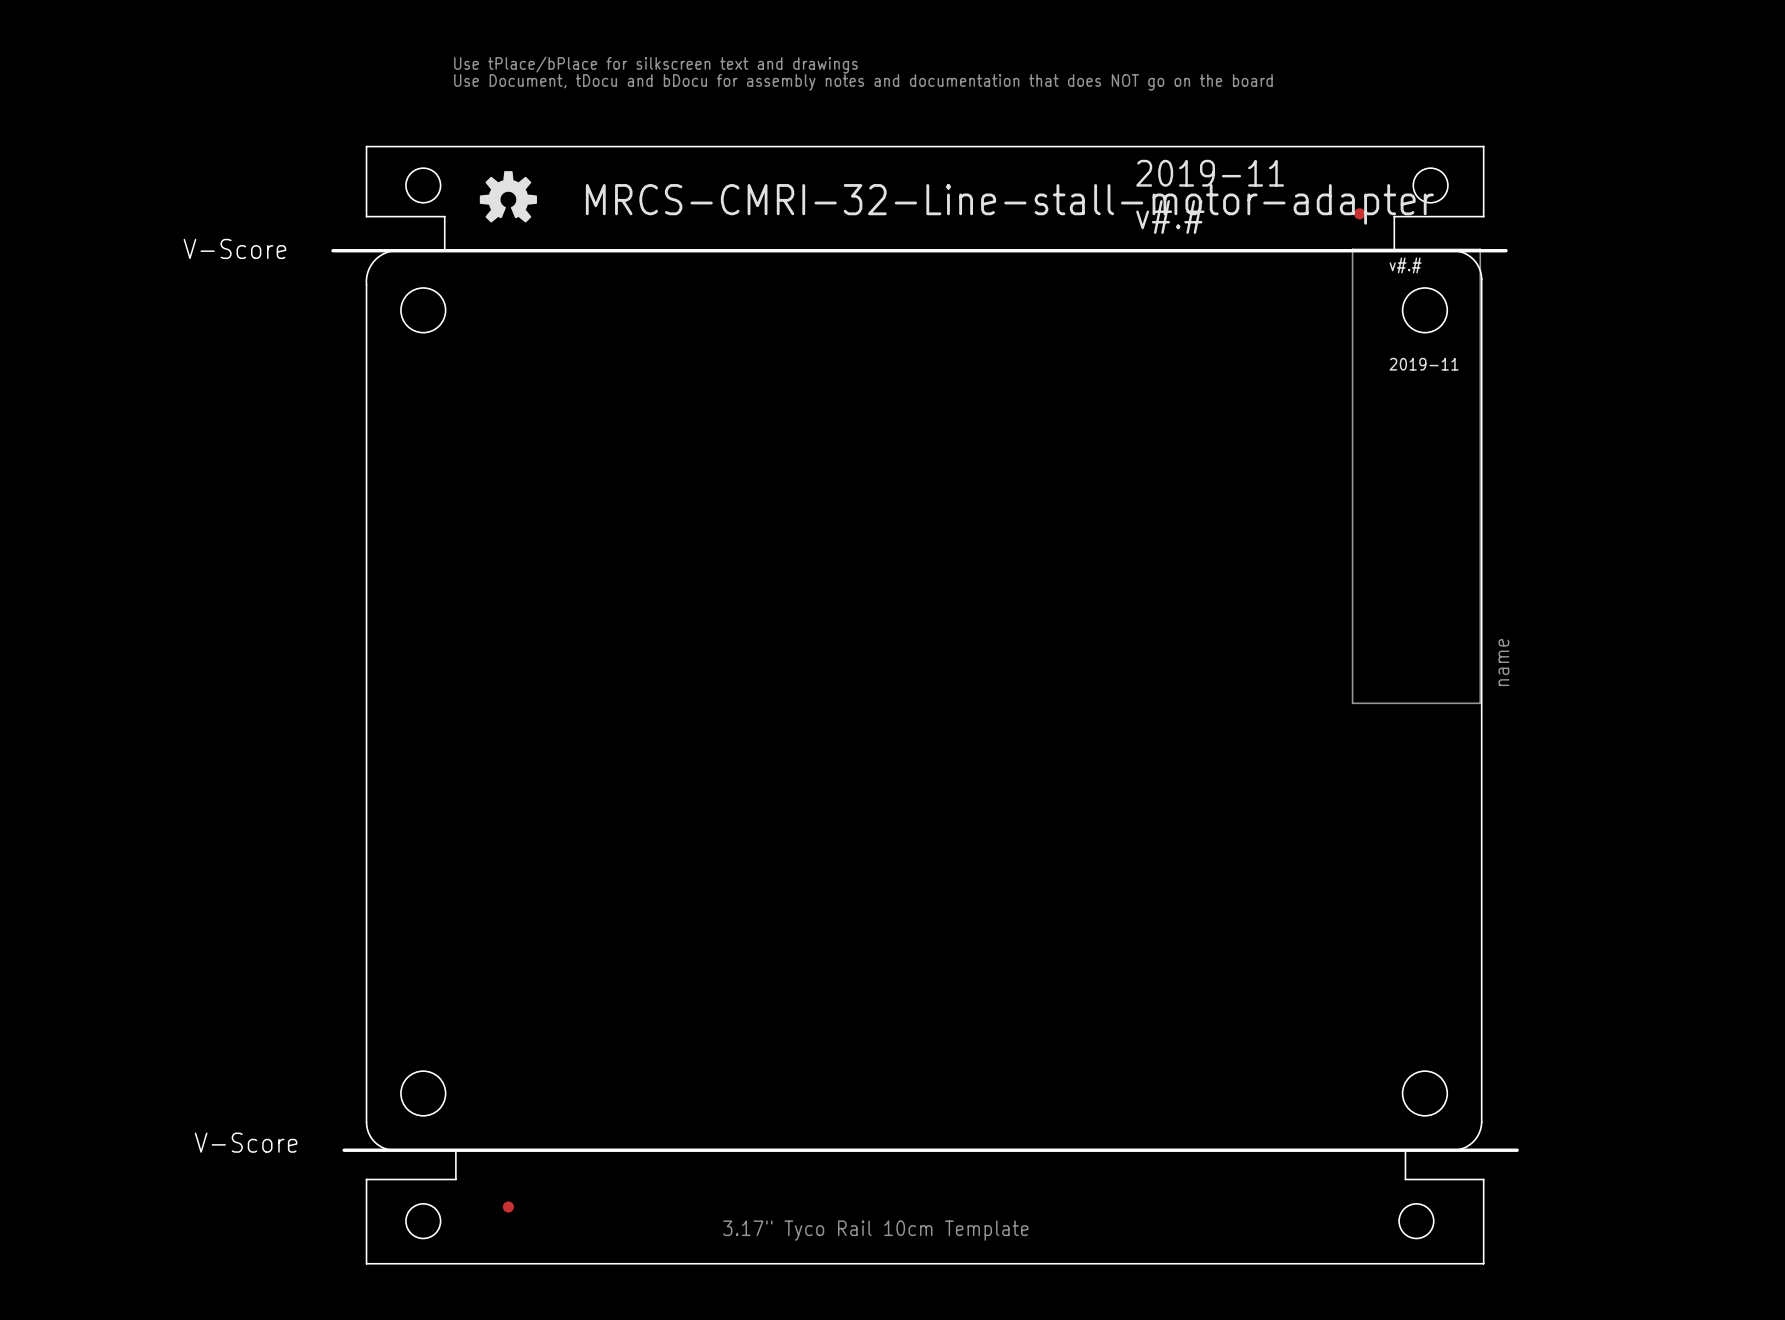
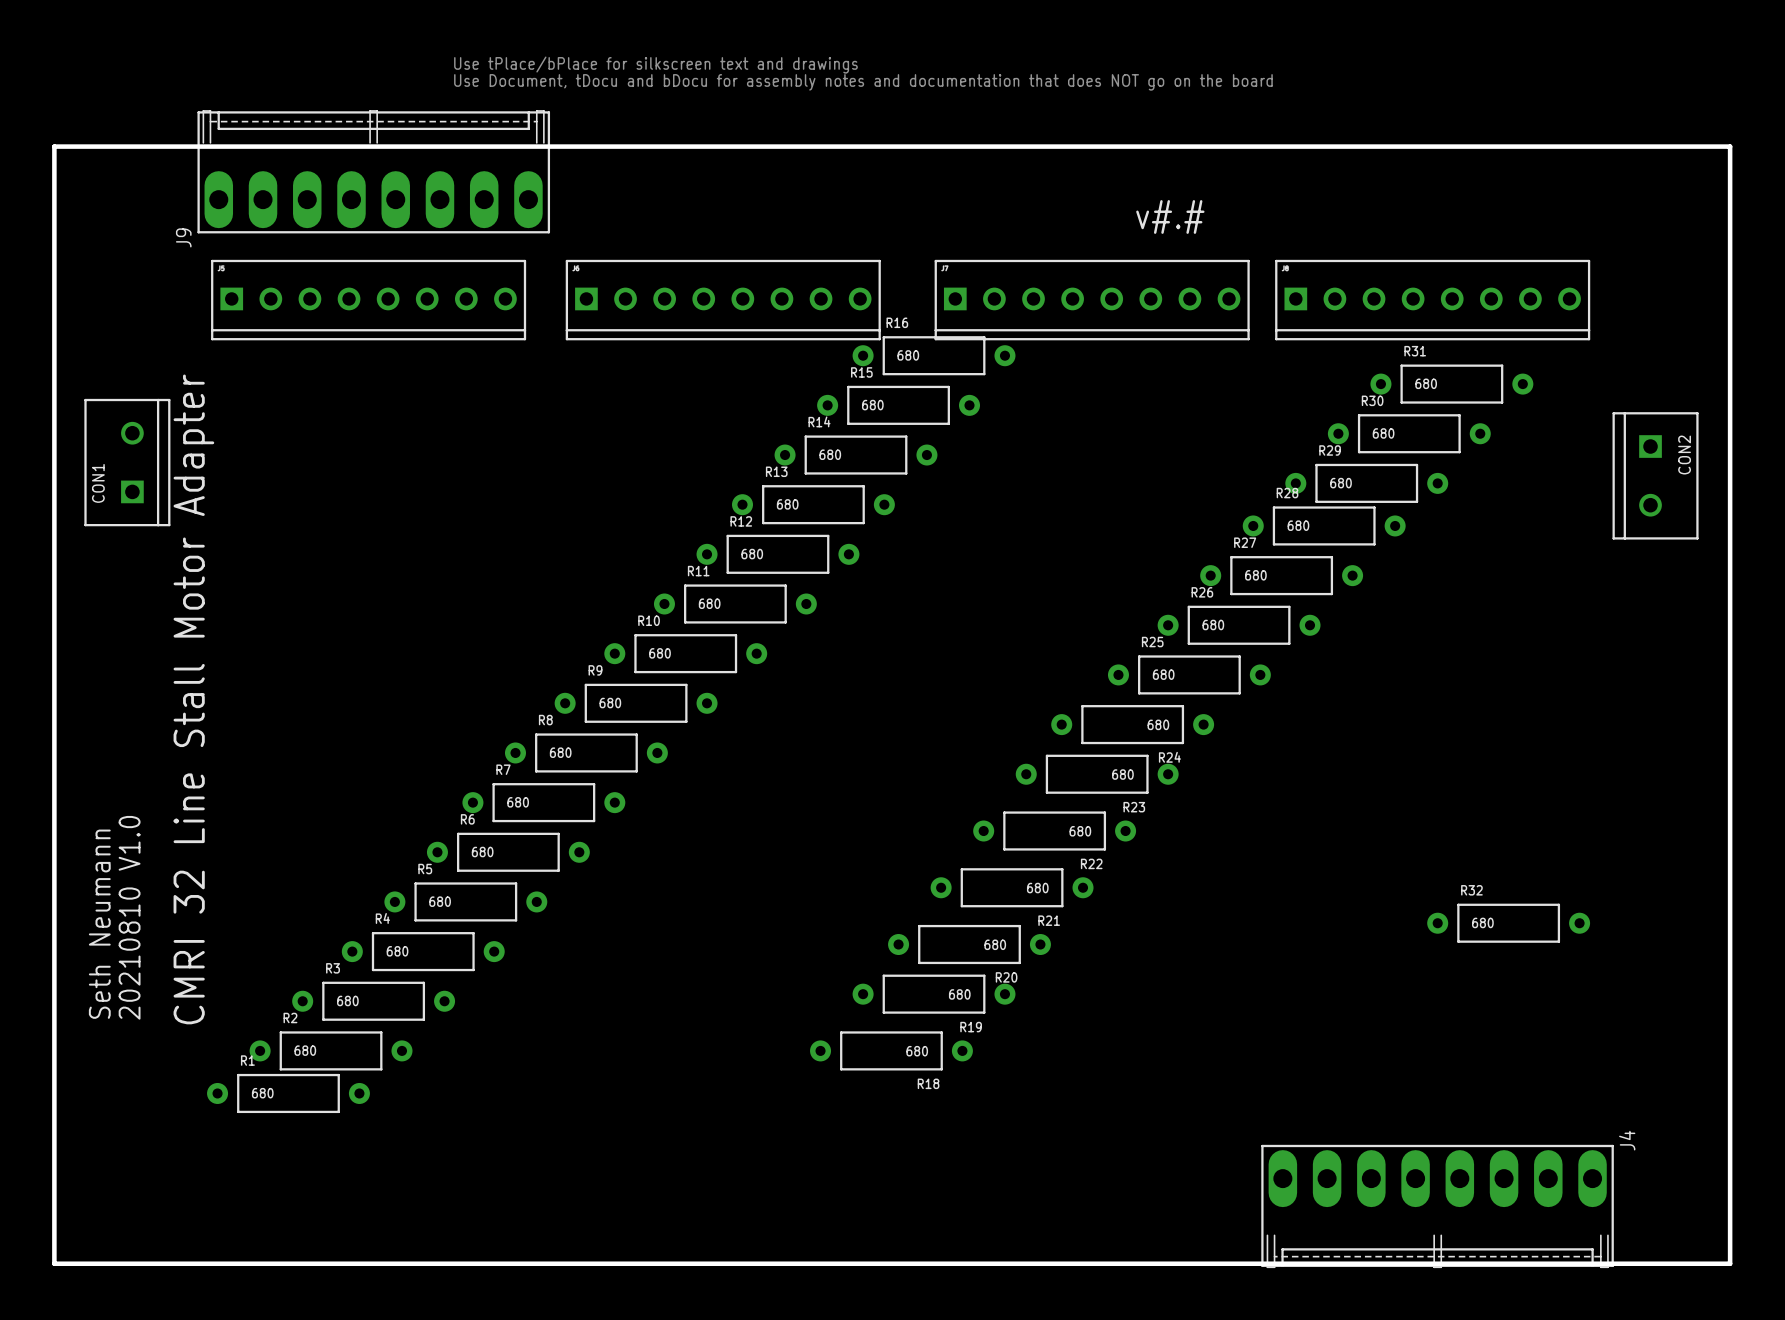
board edge: none -> (54, 146) (1730, 146) (1730, 1263) (54, 1263) (54, 146)
J9: none -> (373, 171)
drawing: [479, 171, 537, 223] -> none
text: 2019-11 (1210, 173) -> none
text: MRCS-CMRI-32-Line-stall-motor-adapter (1009, 204) -> none
part: (1359, 213) -> none
text: v#.# (1405, 265) -> none
part: none -> (368, 300)
part: none -> (723, 300)
part: none -> (1092, 300)
part: none -> (1432, 300)
R16: none -> 680 (934, 355)
text: 2019-11 (1424, 364) -> none
R31: none -> 680 (1451, 384)
R15: none -> 680 (898, 405)
R30: none -> 680 (1409, 433)
R14: none -> 680 (856, 455)
CON1: none -> (127, 462)
CON2: none -> (1655, 475)
R29: none -> 680 (1366, 483)
R13: none -> 680 (813, 504)
R28: none -> 680 (1324, 525)
R12: none -> 680 (777, 554)
R27: none -> 680 (1281, 575)
R11: none -> 680 (735, 604)
R26: none -> 680 (1239, 625)
R10: none -> 680 (685, 653)
R25: none -> 680 (1189, 674)
text: none -> CMRI 32 Line Stall Motor Adapter (193, 699)
R9: none -> 680 (636, 703)
part: (925, 705) -> none
R24: none -> 680 (1132, 724)
R8: none -> 680 (586, 752)
R23: none -> 680 (1097, 774)
R7: none -> 680 (543, 802)
R22: none -> 680 (1054, 831)
R6: none -> 680 (508, 852)
R21: none -> 680 (1012, 887)
R5: none -> 680 (465, 901)
text: none -> 20210810 V1.0 (129, 917)
R32: none -> 680 (1508, 923)
text: none -> Seth Neumann (99, 924)
R20: none -> 680 (969, 944)
R4: none -> 680 (423, 951)
R19: none -> 680 (934, 994)
R3: none -> 680 (373, 1001)
R2: none -> 680 (331, 1050)
R18: none -> 680 (891, 1050)
R1: none -> 680 (288, 1093)
part: (508, 1206) -> none
J4: none -> (1437, 1206)

